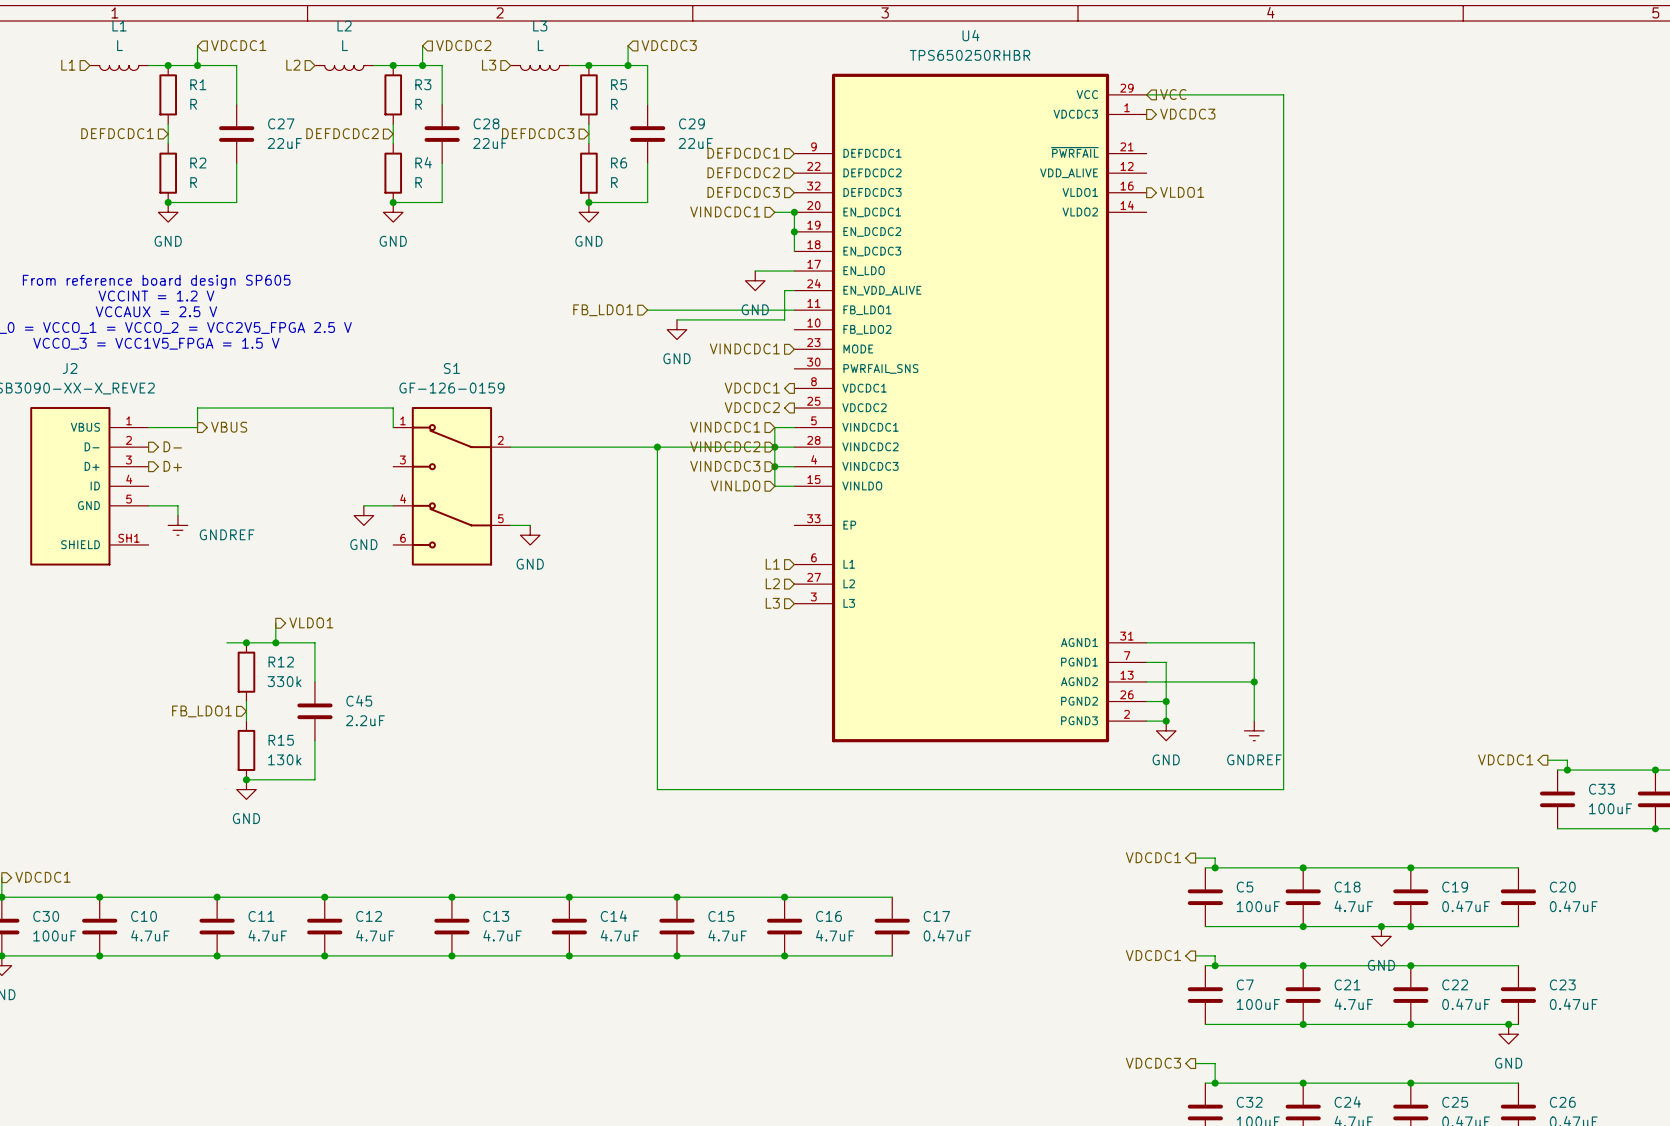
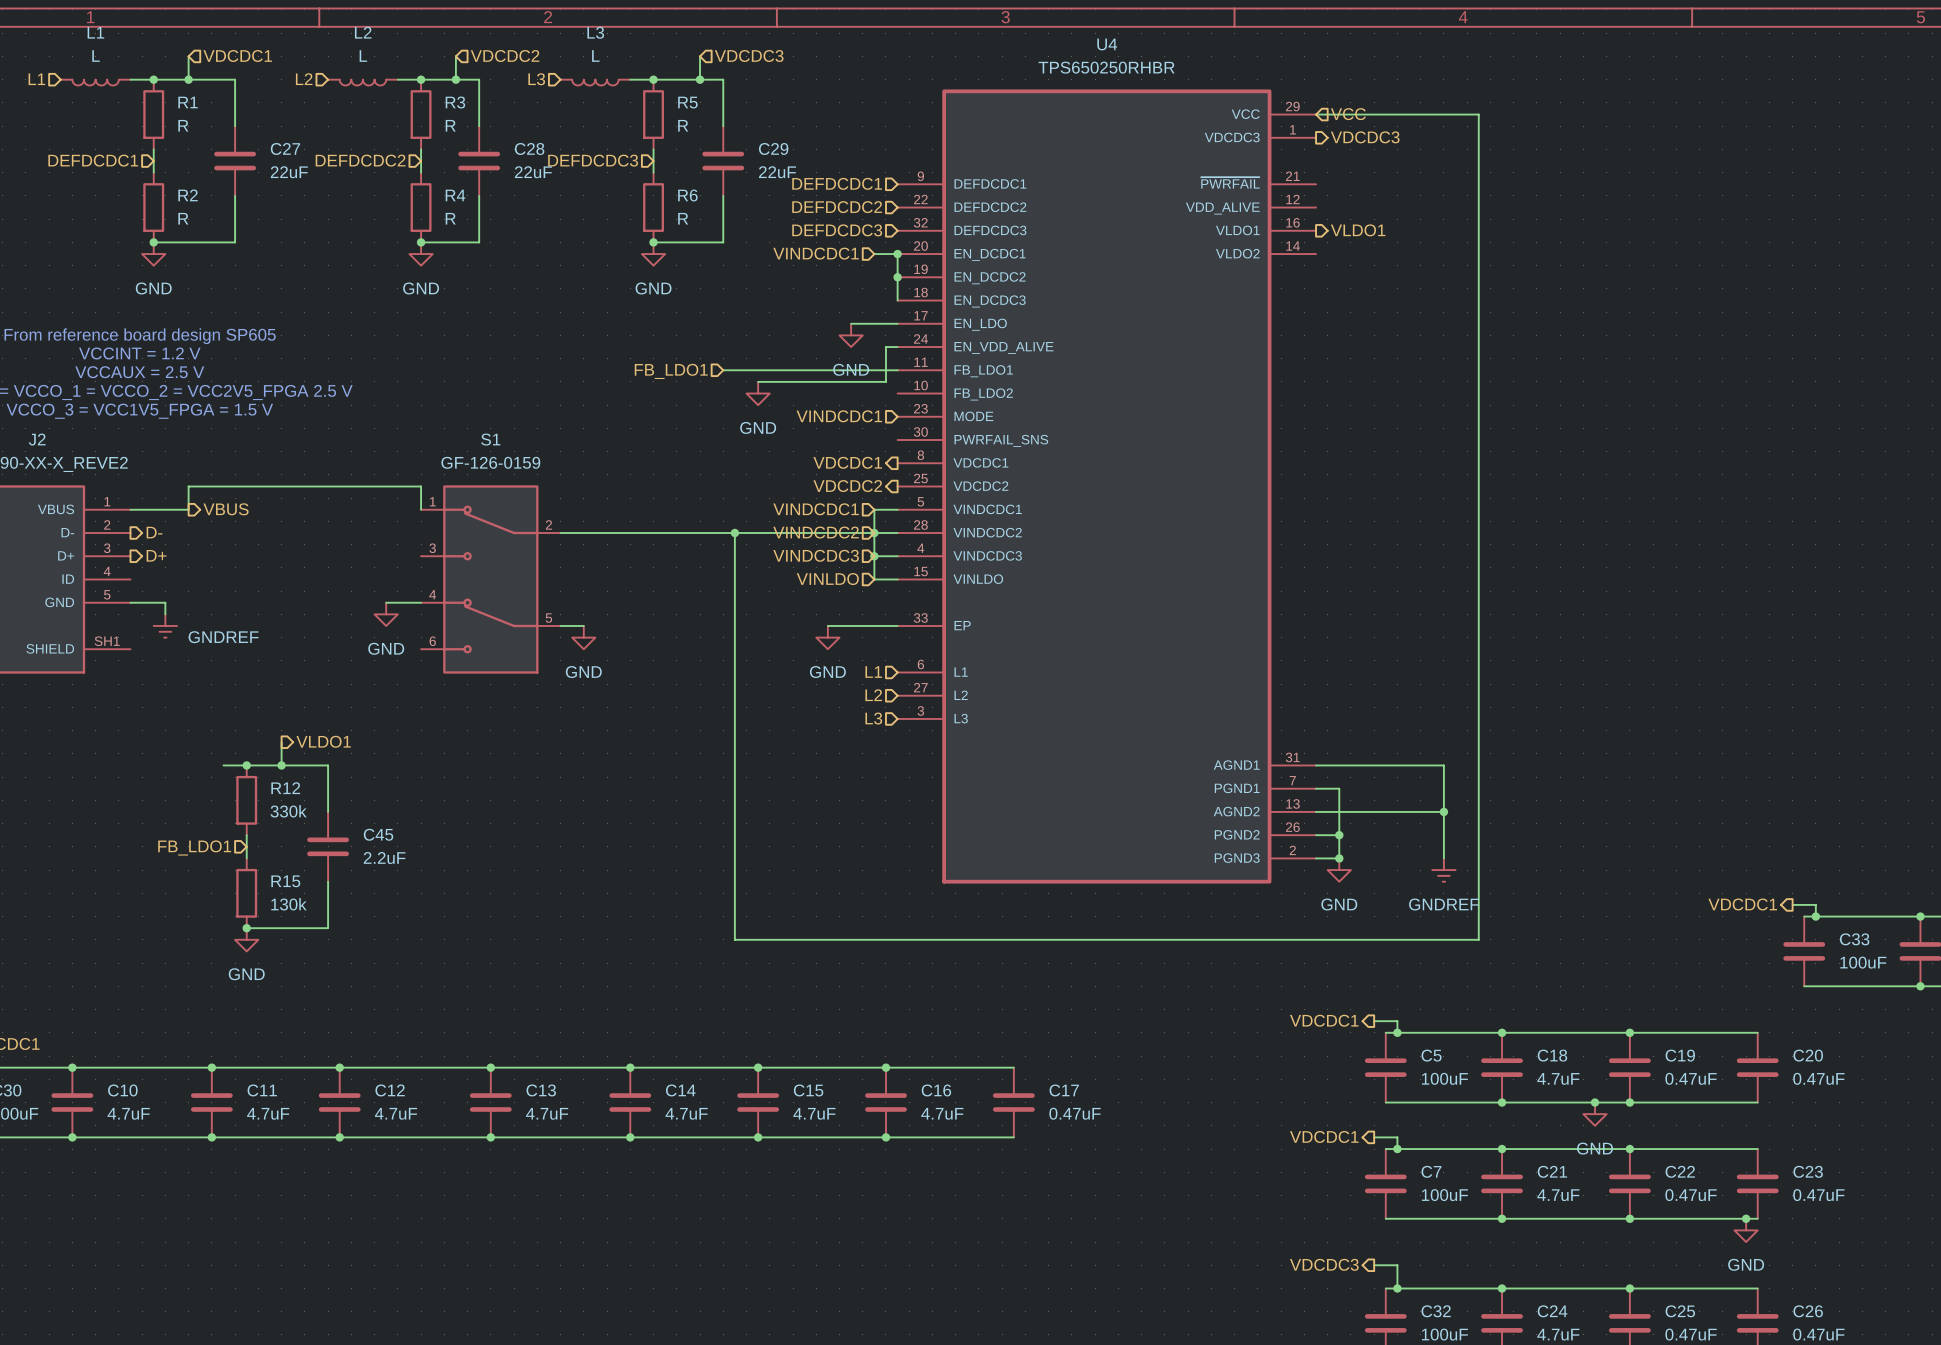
wire: none -> (827, 625) (897, 625)
power symbol: none -> GND (827, 637)

